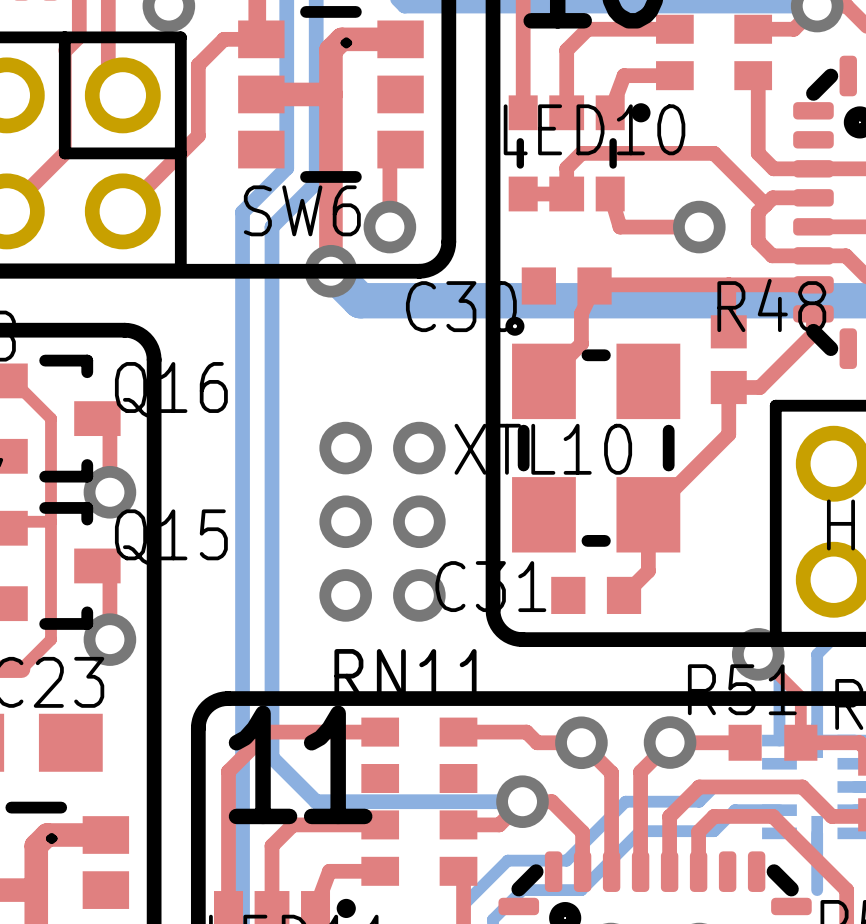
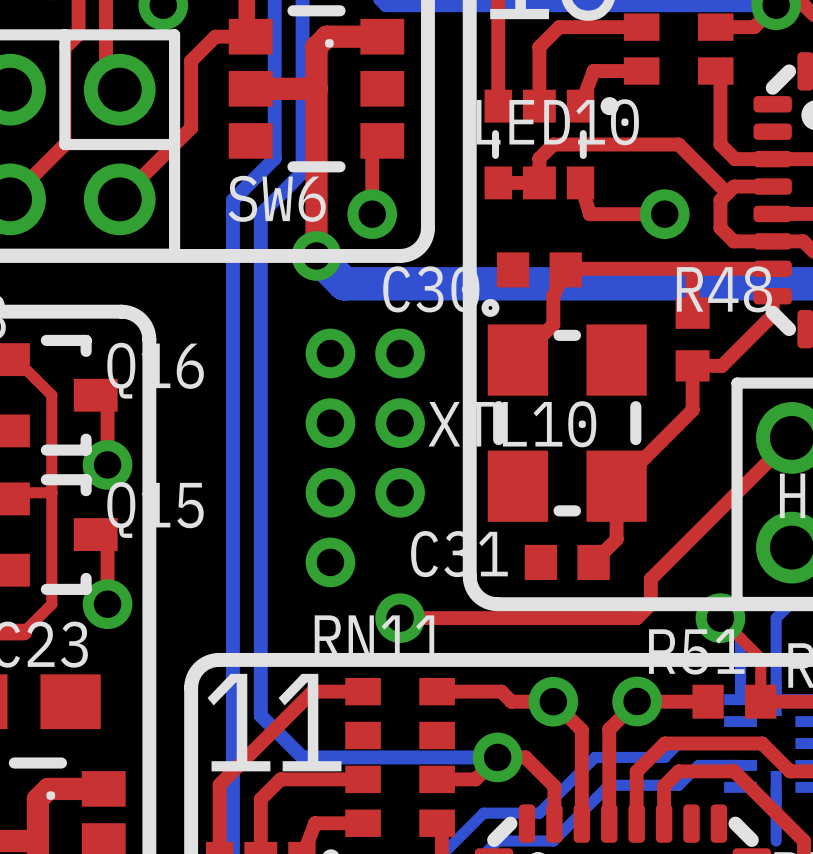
via: none -> (330, 353)
via: none -> (400, 353)
top track: none -> (791, 437) (650, 578) (650, 604) (636, 618) (400, 618)
via position: (419, 595) -> (400, 618)
top track: (326, 732) (267, 732) (228, 771) (228, 830) -> (312, 691) (219, 784)

